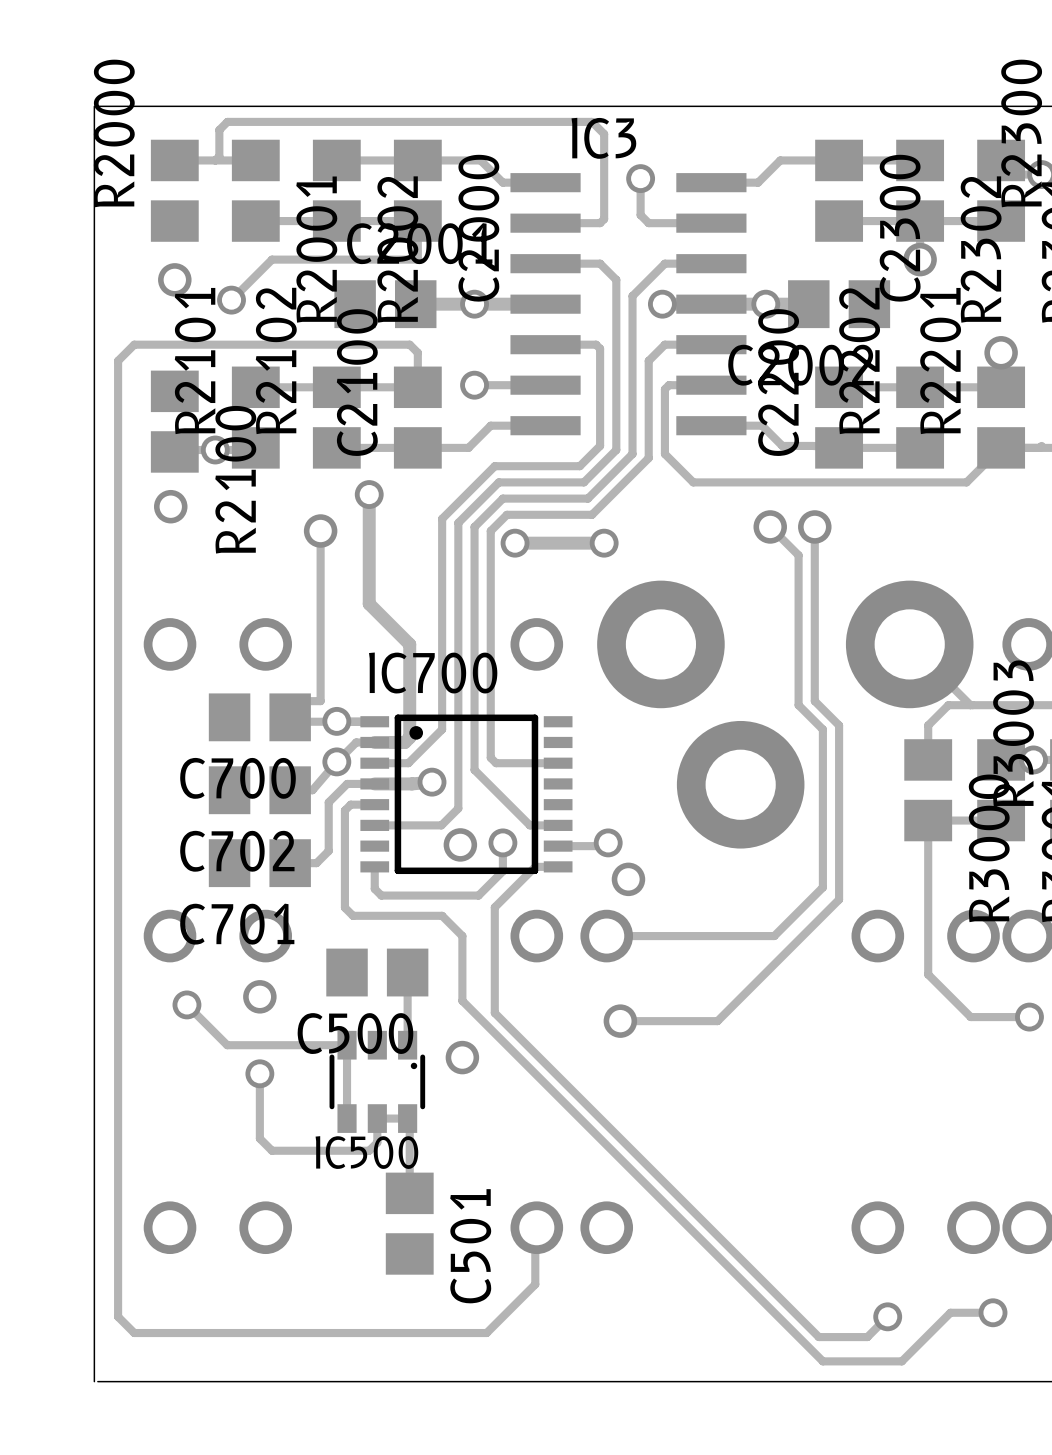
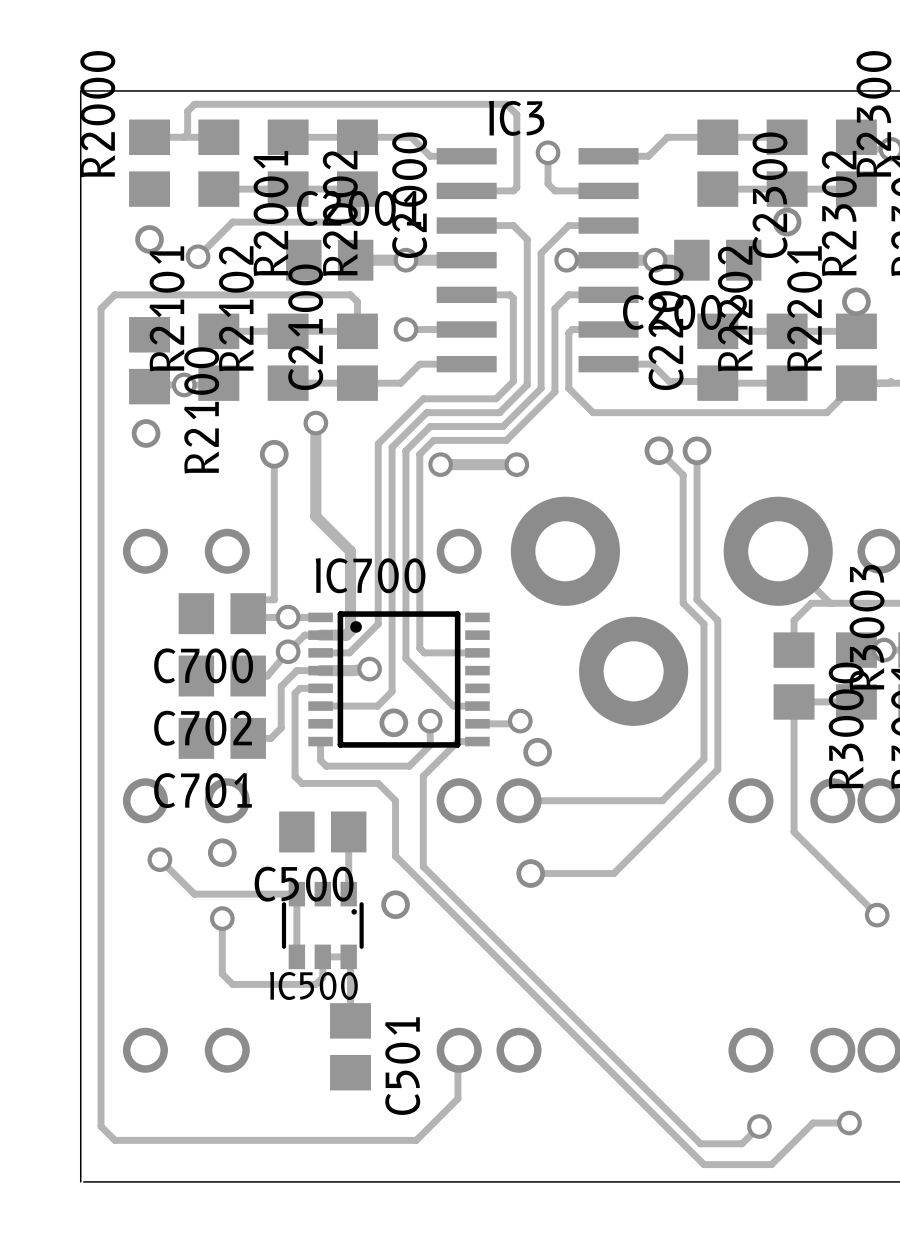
track: (928, 972) (970, 1017) (1029, 1017) -> (794, 831) (877, 915)
via: (1029, 1017) -> none
via: none -> (877, 915)

